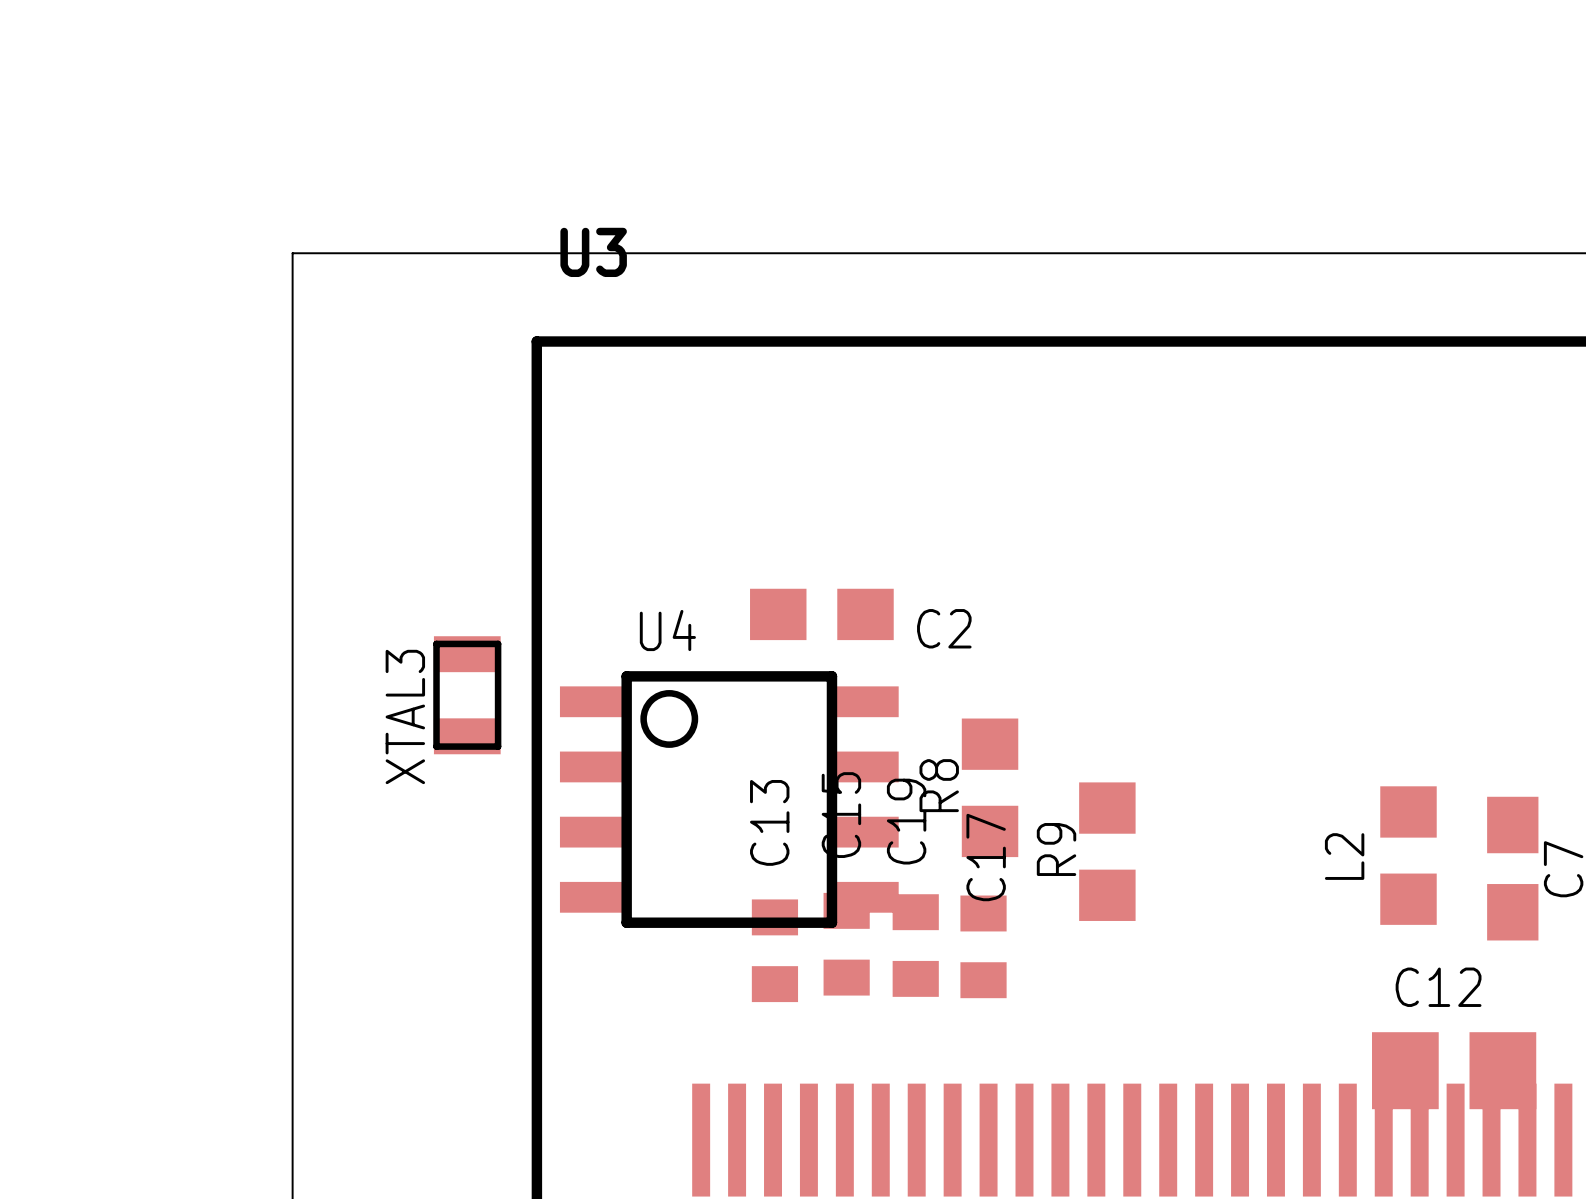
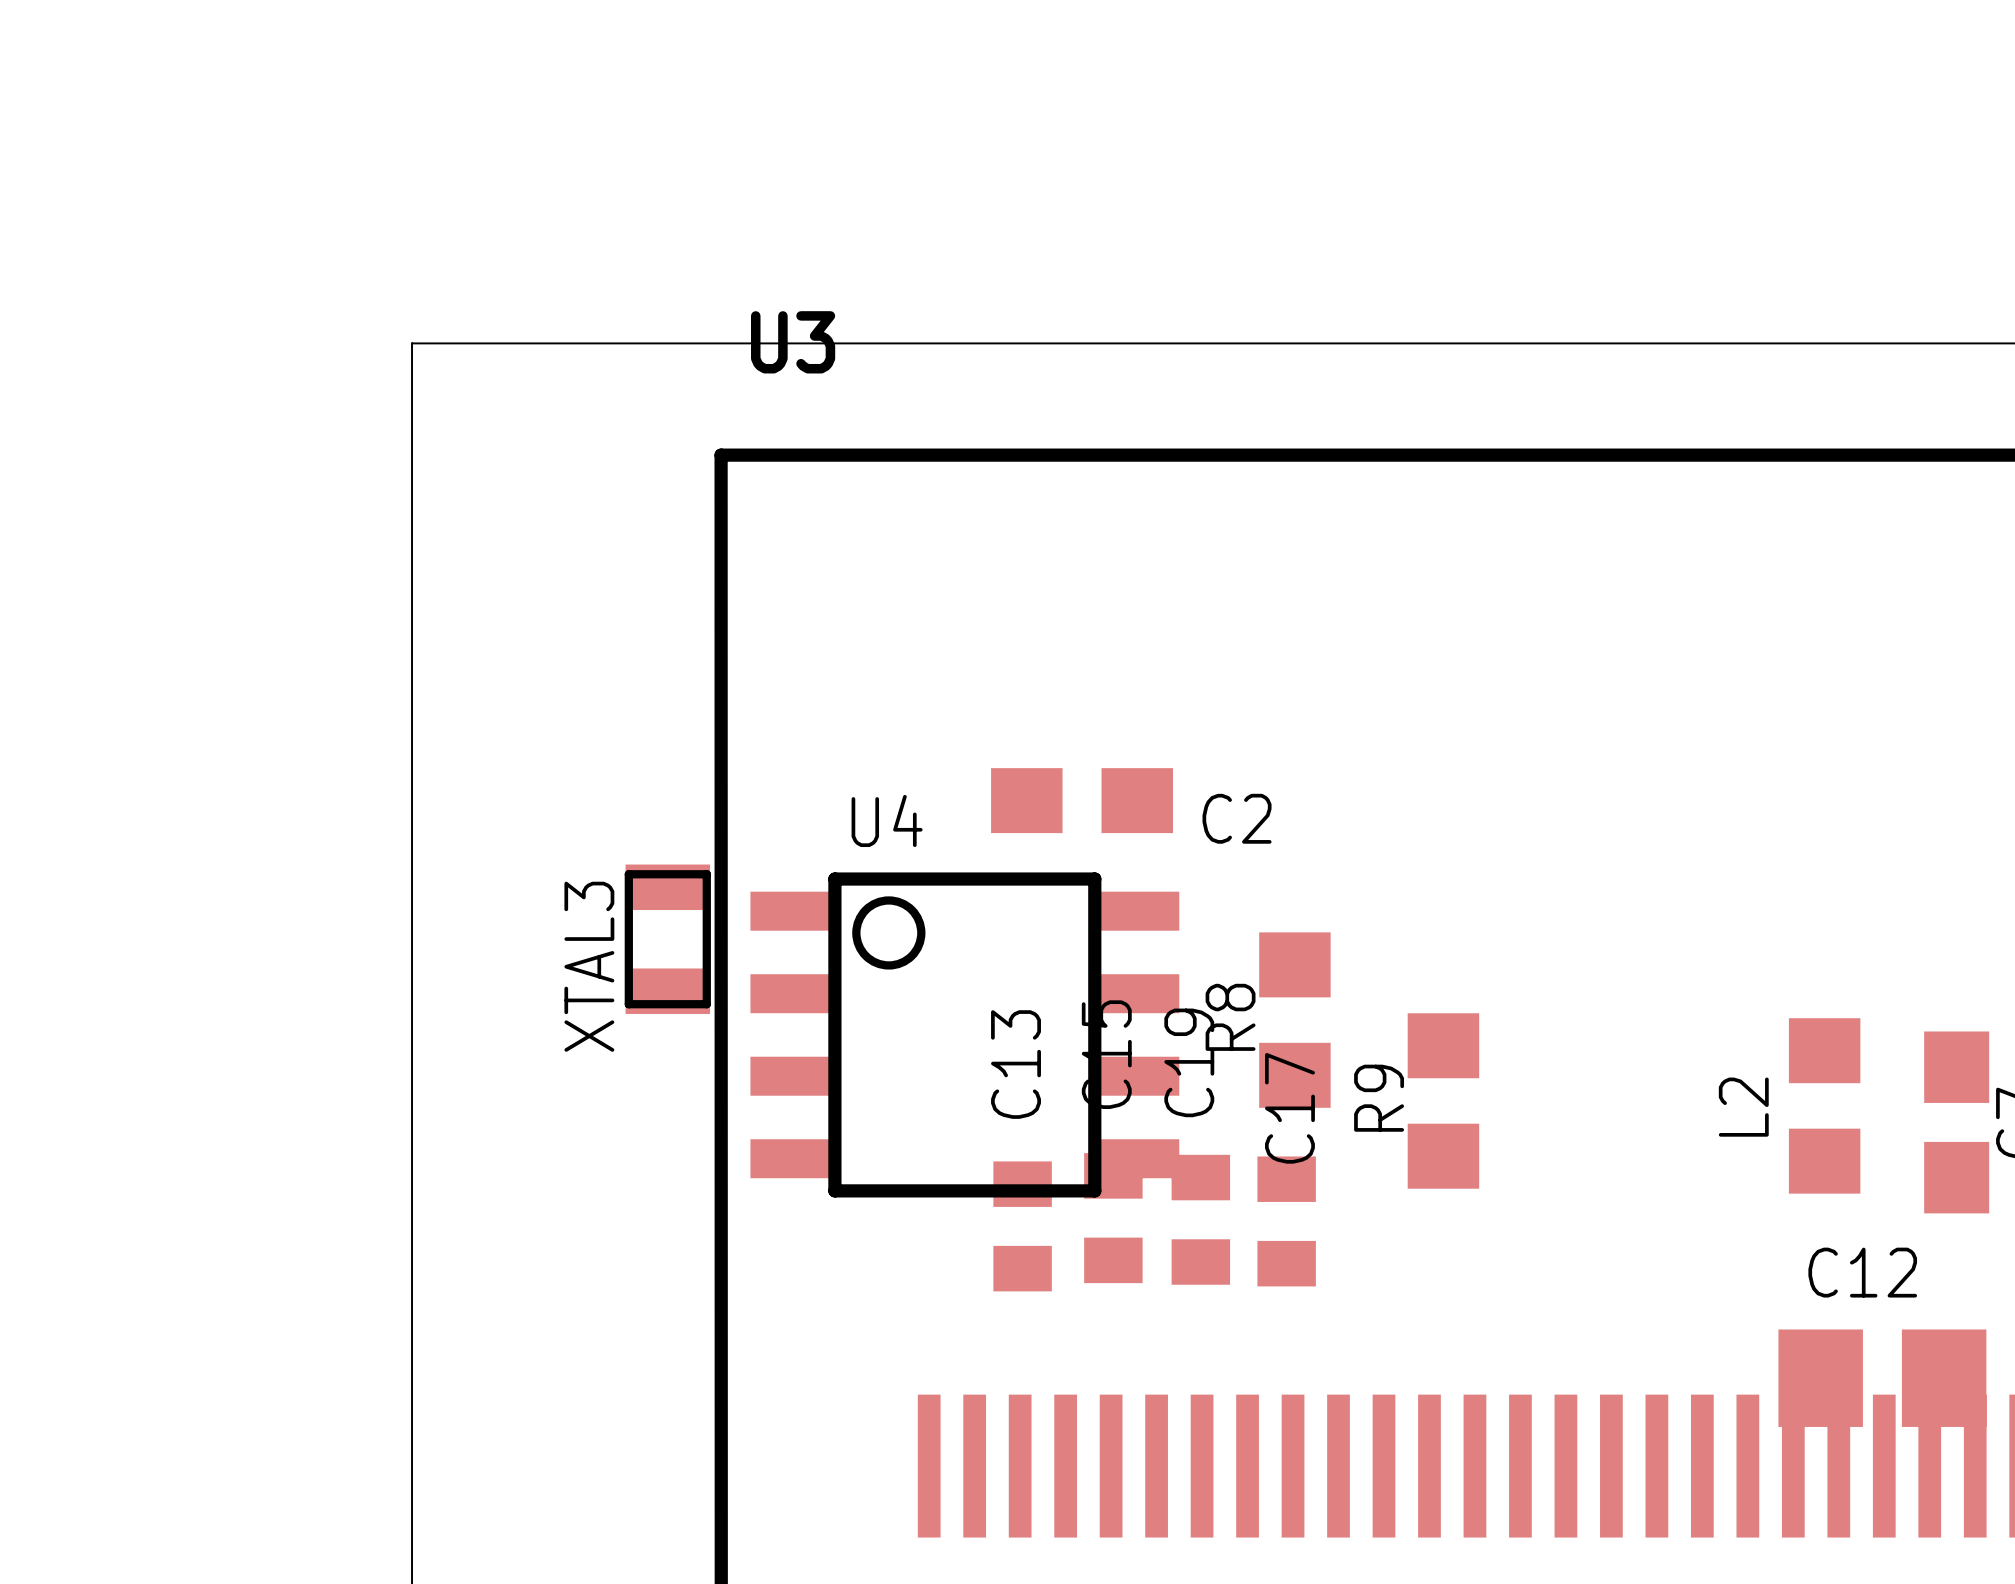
XTAL3 position: (467, 695) -> (667, 939)

